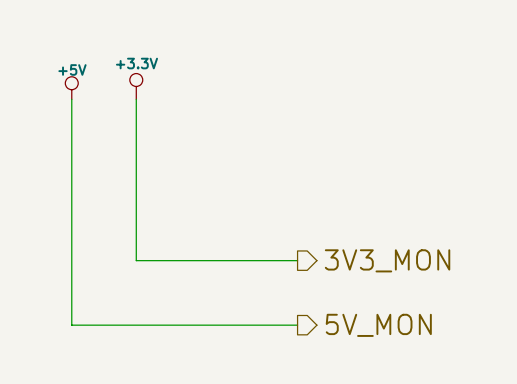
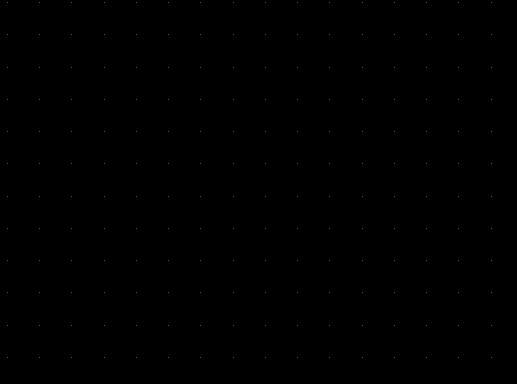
power symbol: +3.3V (136, 86) -> none
power symbol: +5V (71, 88) -> none
wire: (71, 99) (71, 325) (297, 325) -> none
wire: (136, 99) (136, 260) (297, 260) -> none
hierarchical label: 3V3_MON (387, 260) -> none
hierarchical label: 5V_MON (378, 325) -> none

